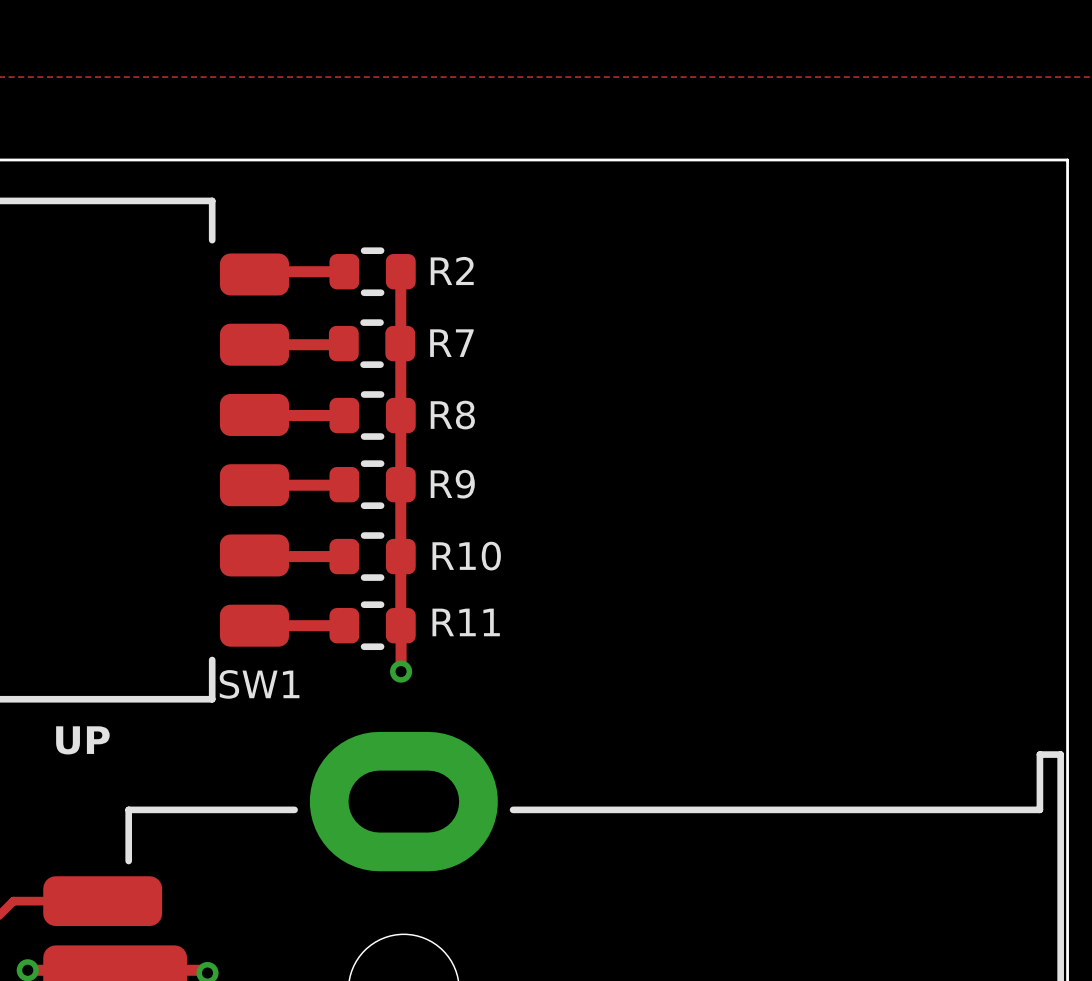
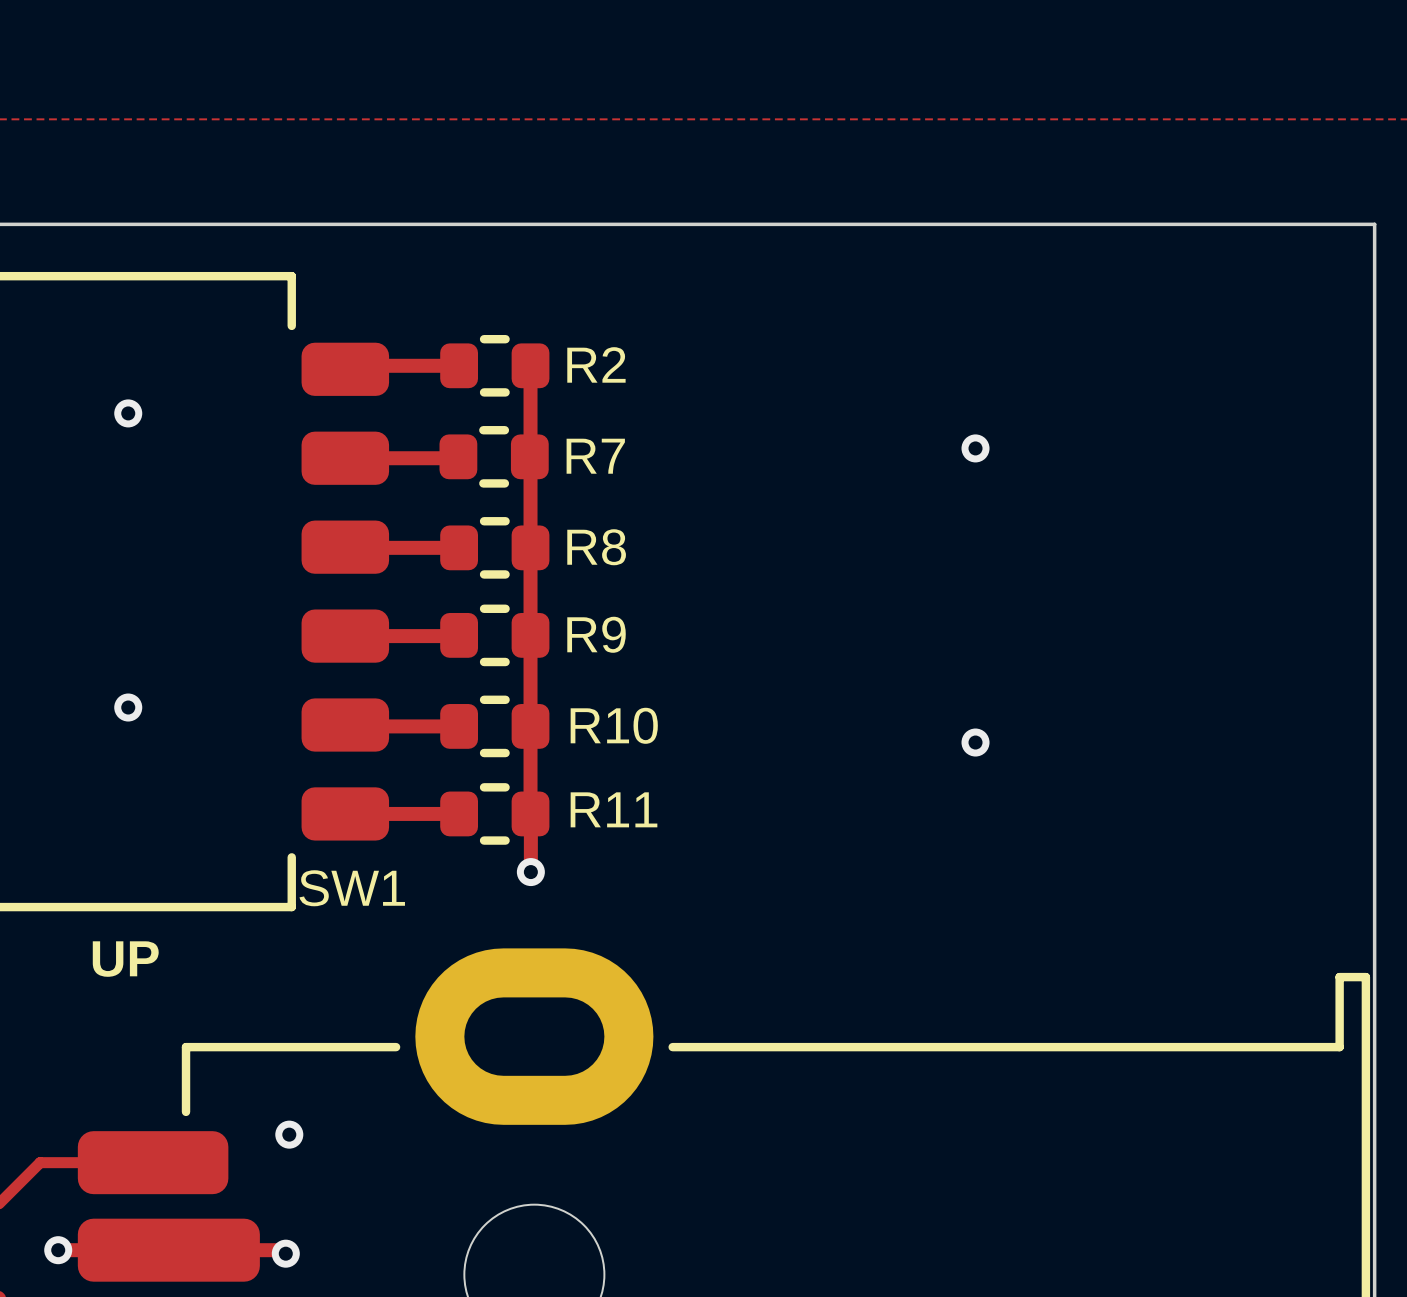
via: none -> (128, 413)
via: none -> (975, 448)
via: none -> (128, 707)
via: none -> (975, 742)
via: none -> (289, 1134)

